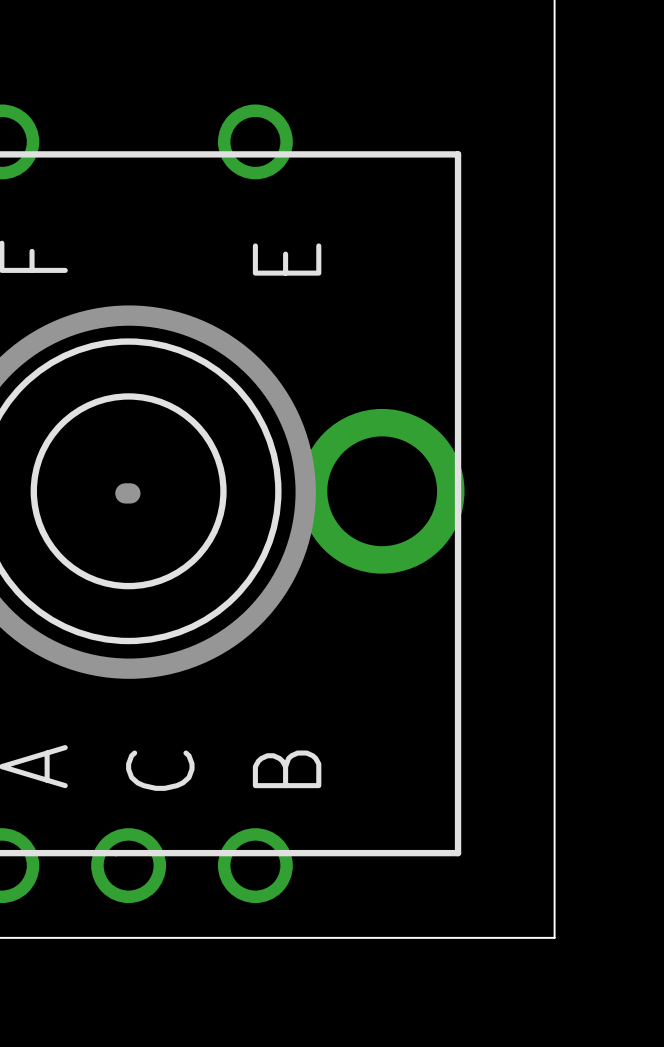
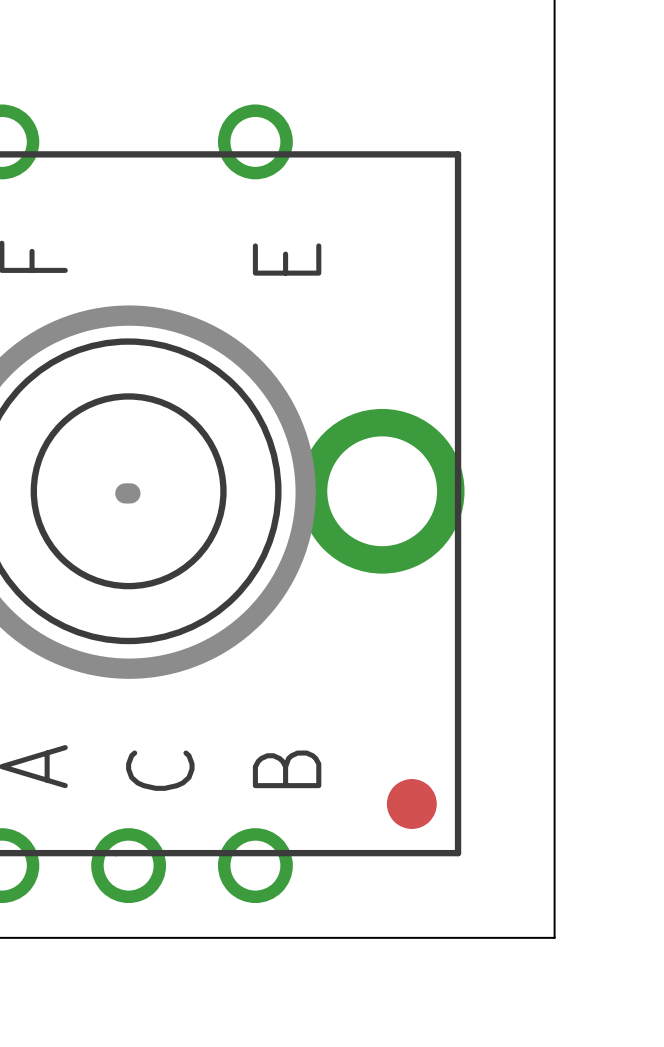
part: none -> (411, 803)

